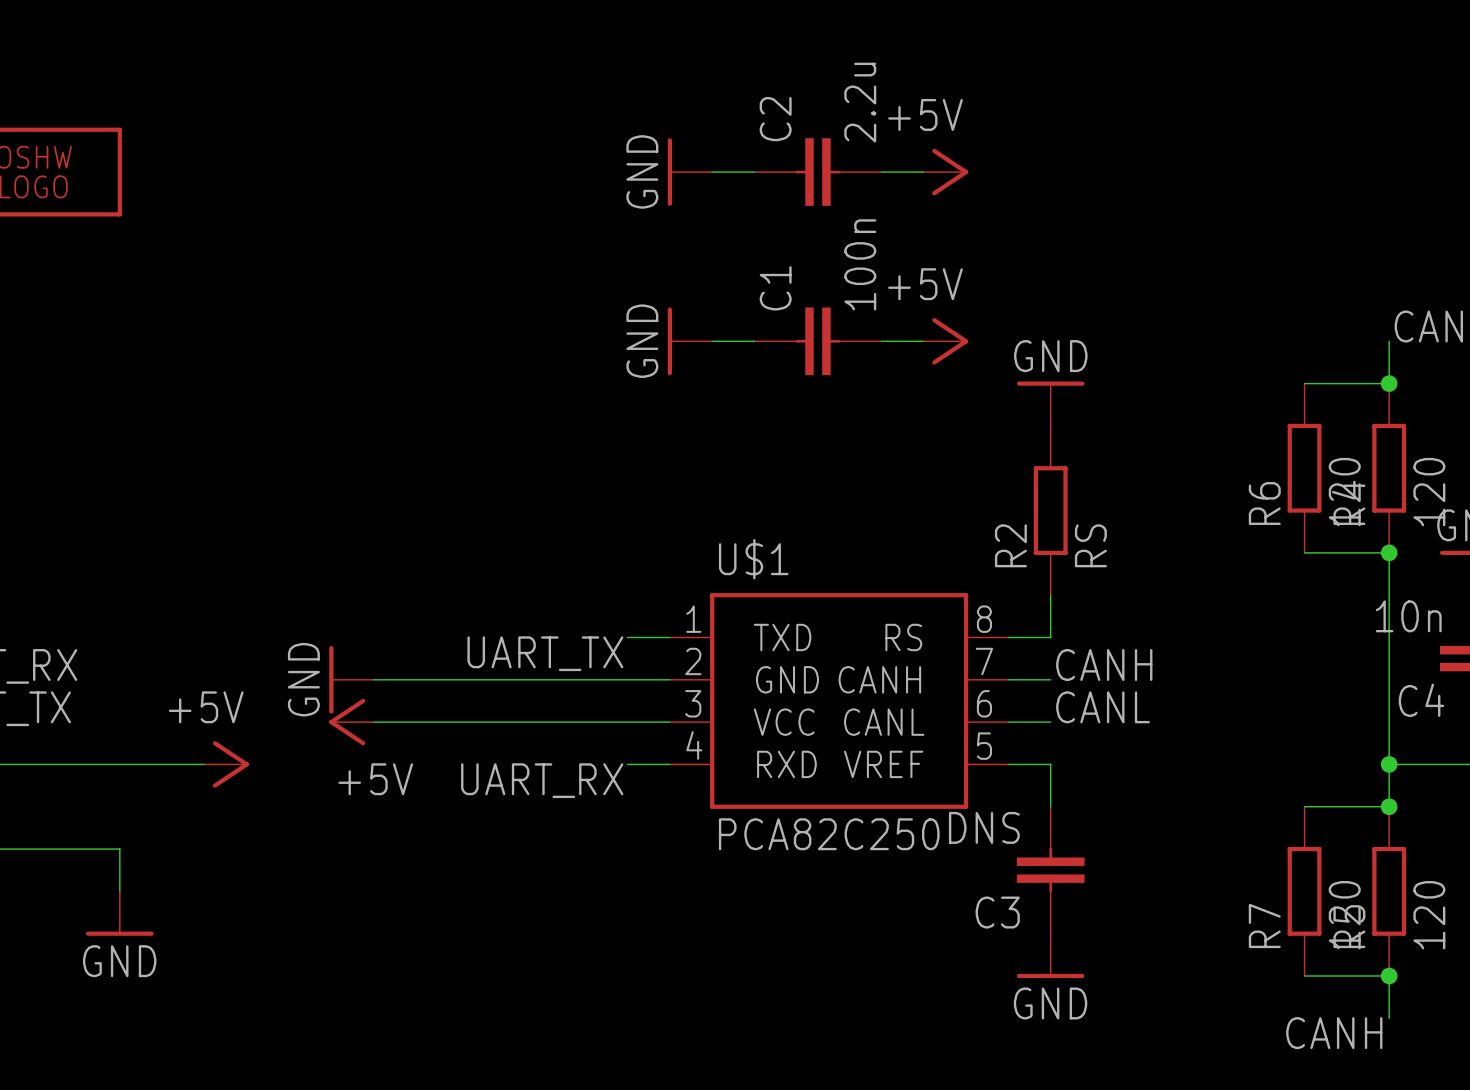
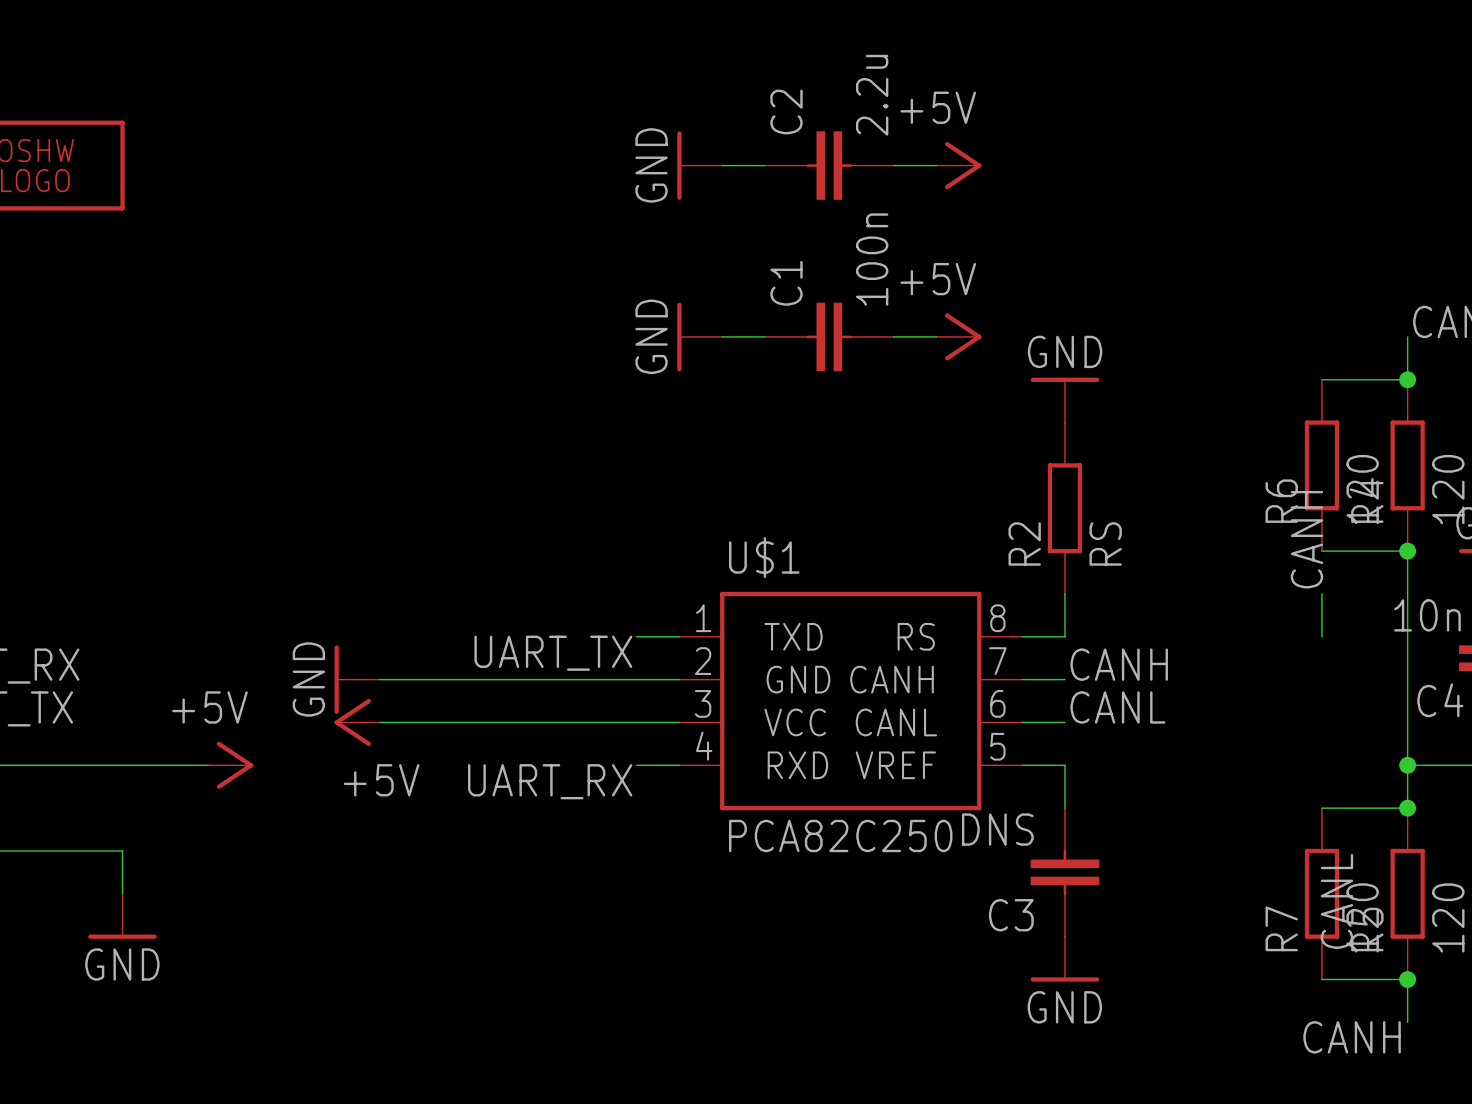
label: none -> CANH (1306, 539)
wire: none -> (1321, 593) (1321, 636)
label: none -> CANL (1336, 901)

